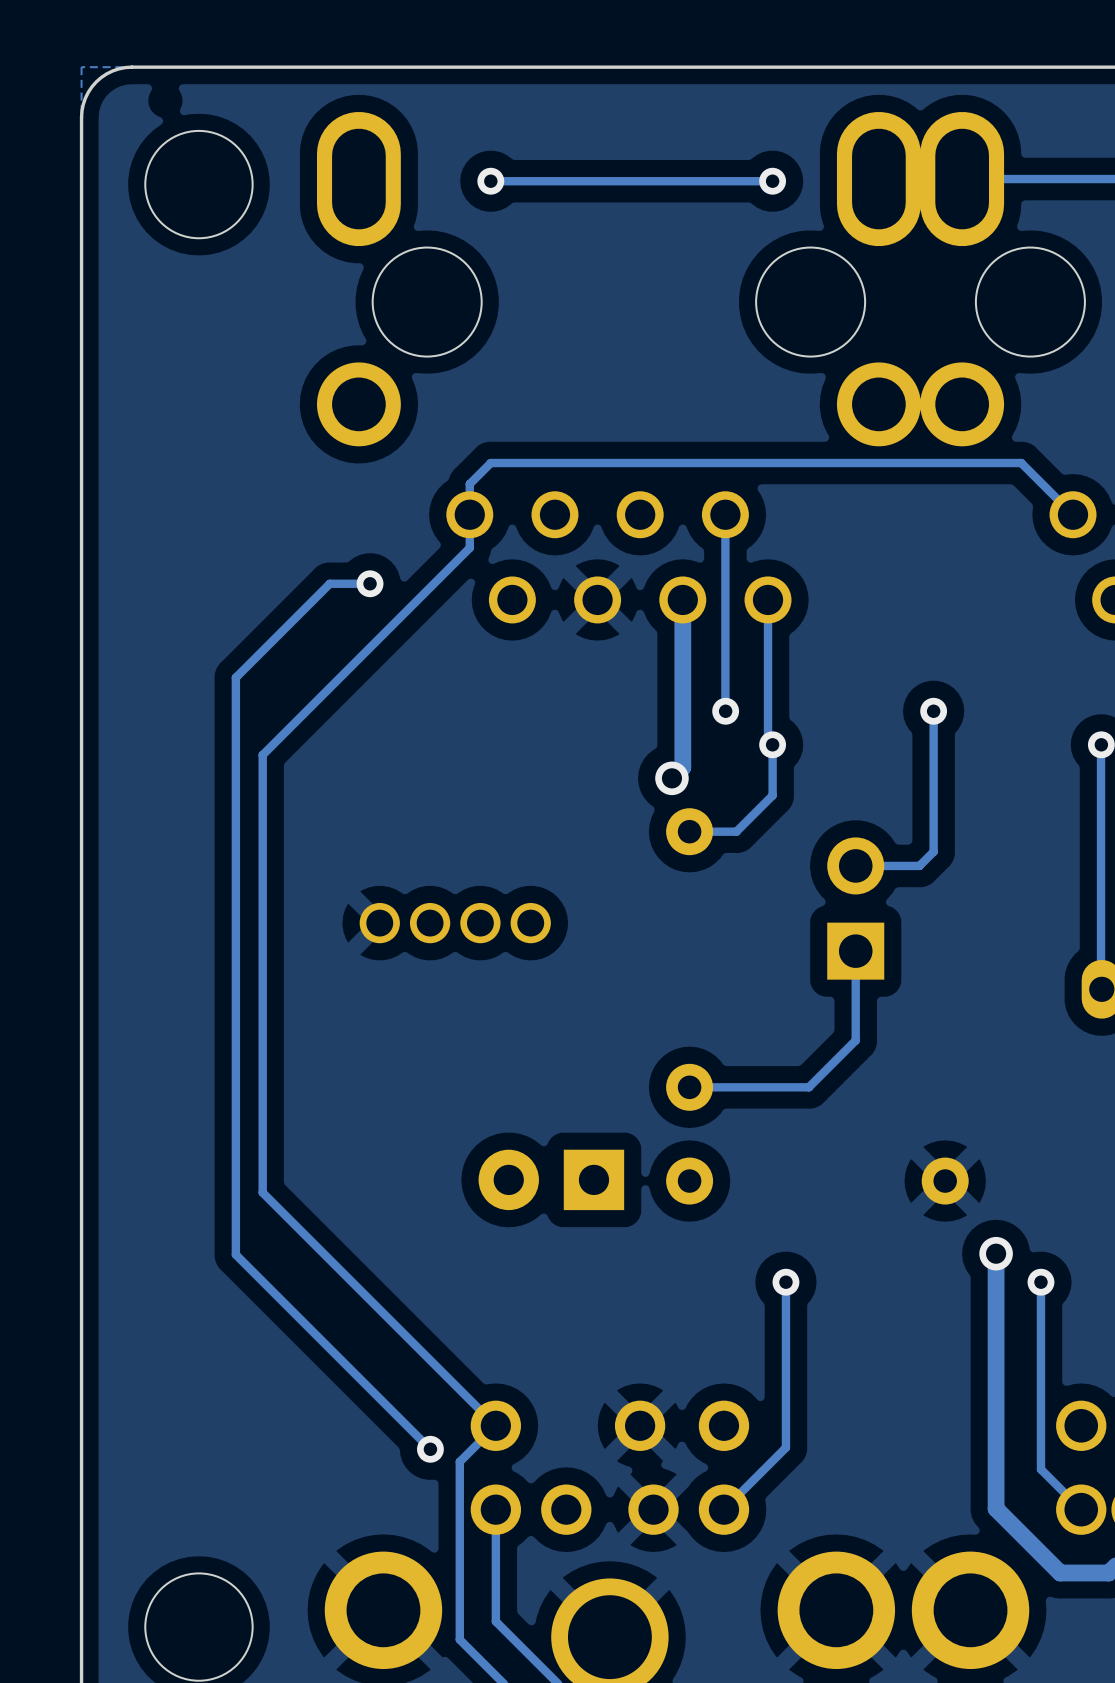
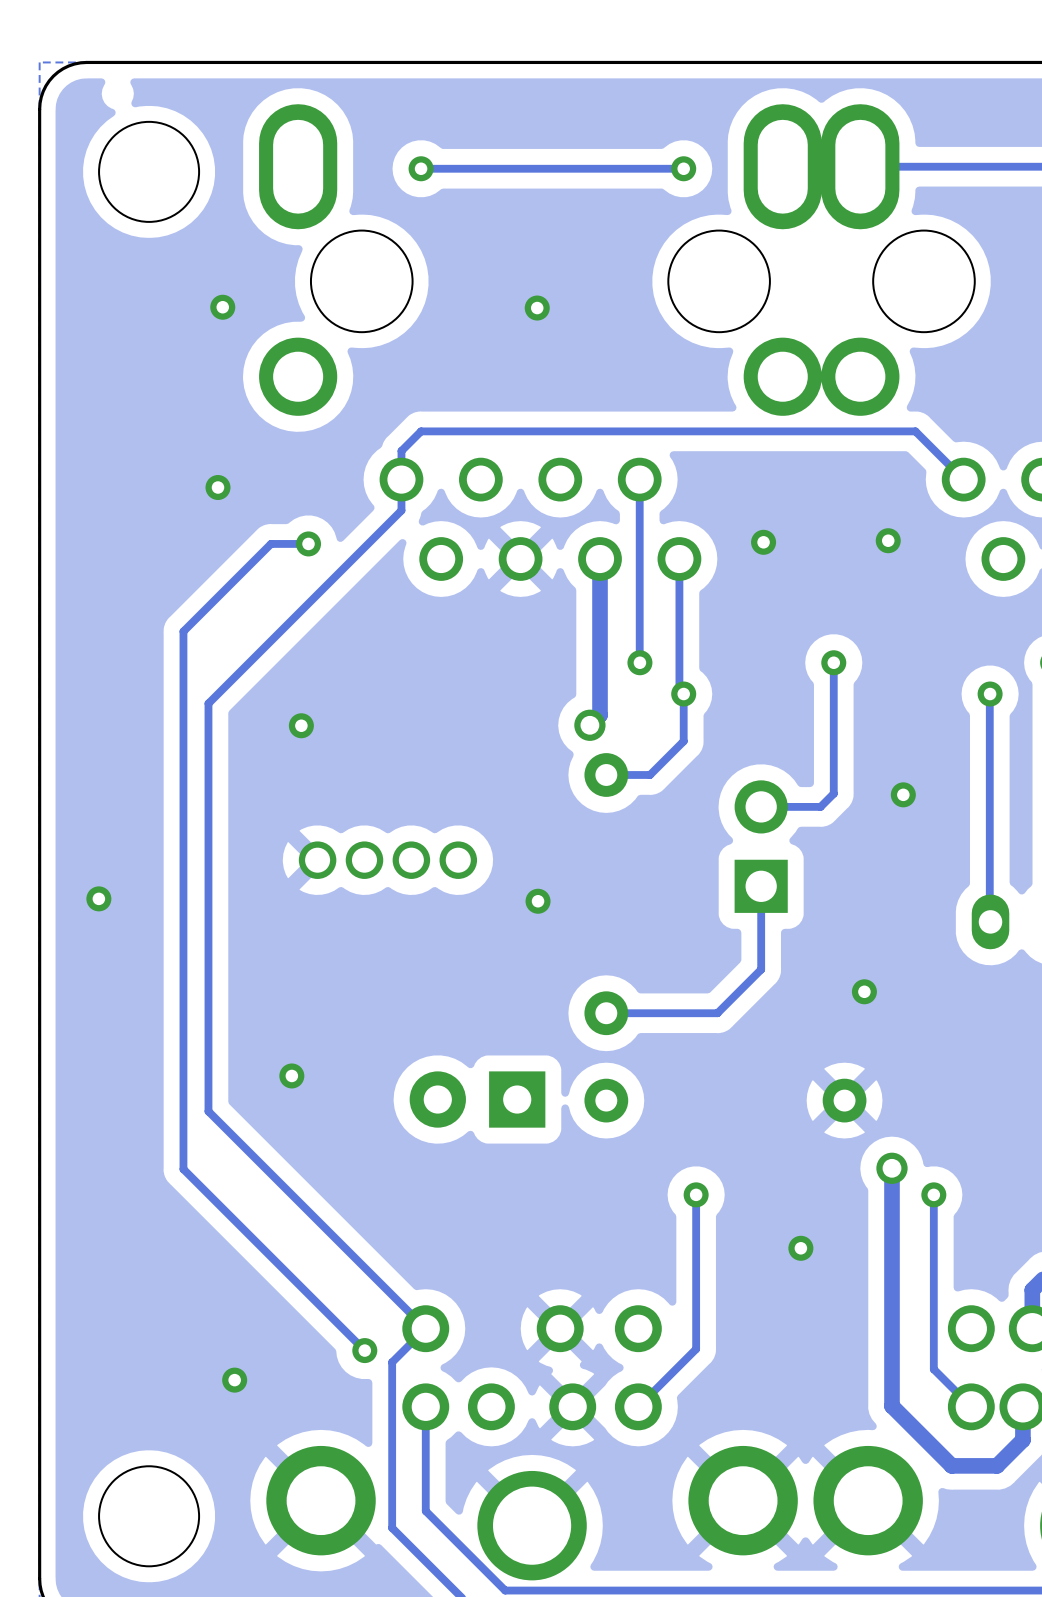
via: none -> (222, 307)
via: none -> (537, 308)
via: none -> (217, 487)
via: none -> (888, 540)
via: none -> (763, 542)
via: none -> (301, 725)
via: none -> (903, 794)
via: none -> (98, 898)
via: none -> (538, 901)
via: none -> (864, 991)
via: none -> (291, 1075)
via: none -> (800, 1248)
via: none -> (234, 1380)

